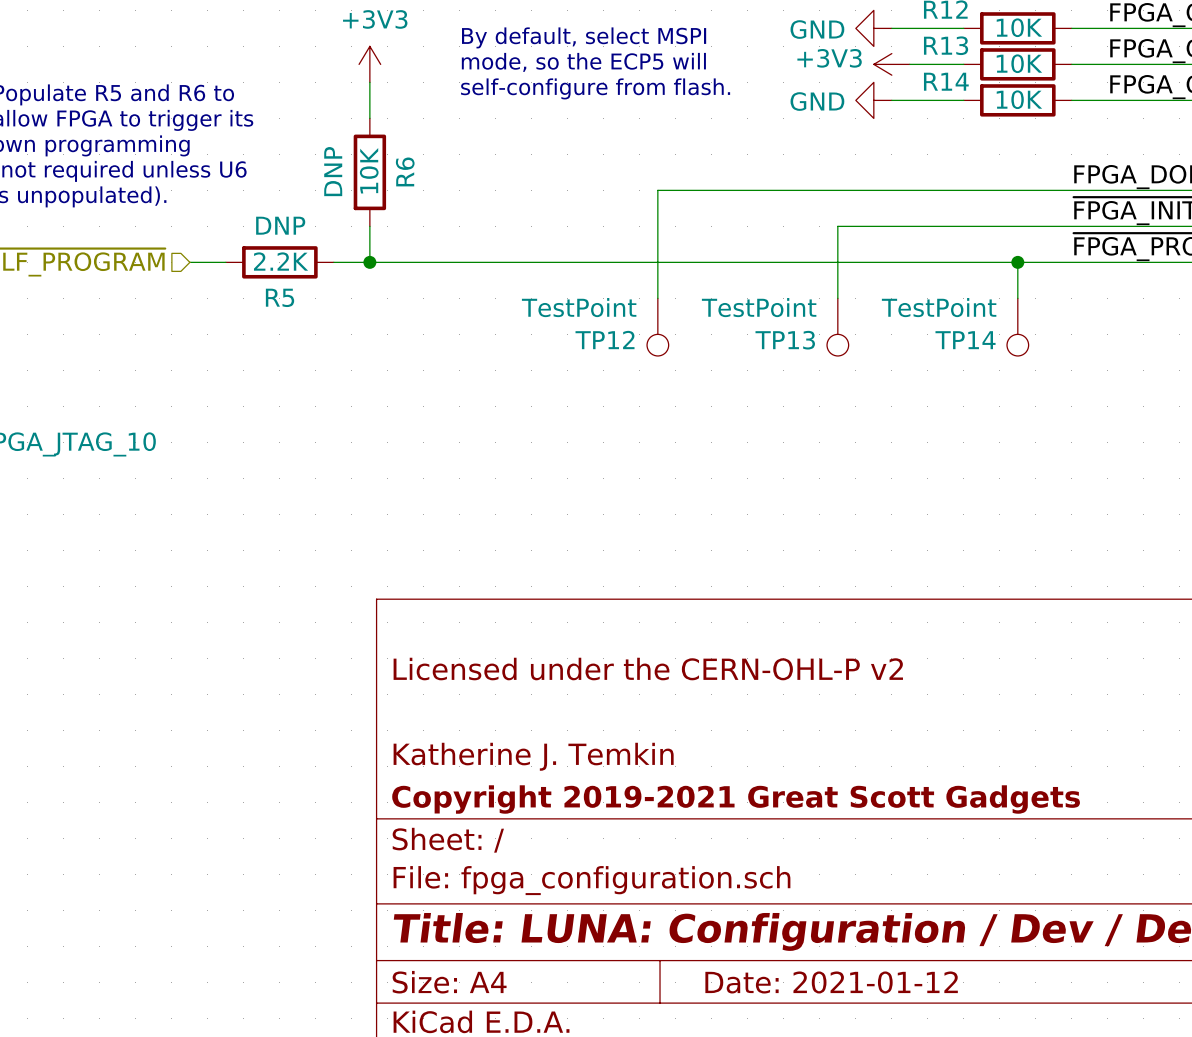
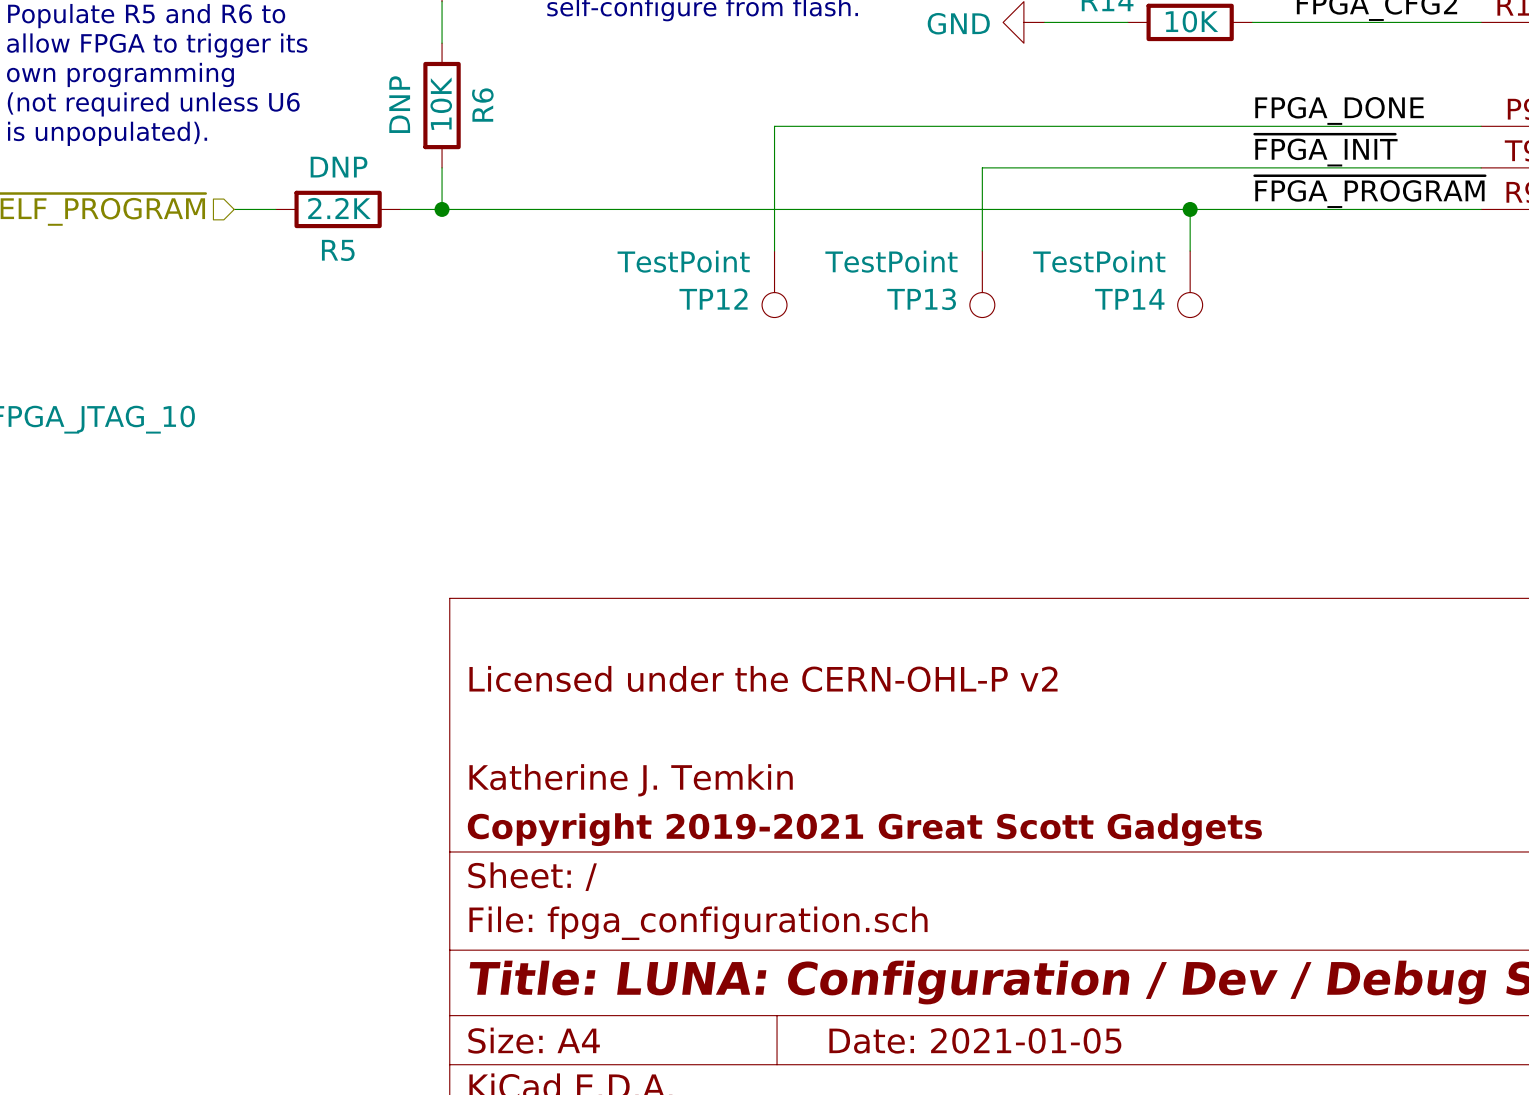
title block: Date: 2021-01-12 (831, 982) -> Date: 2021-01-05 (975, 1040)

